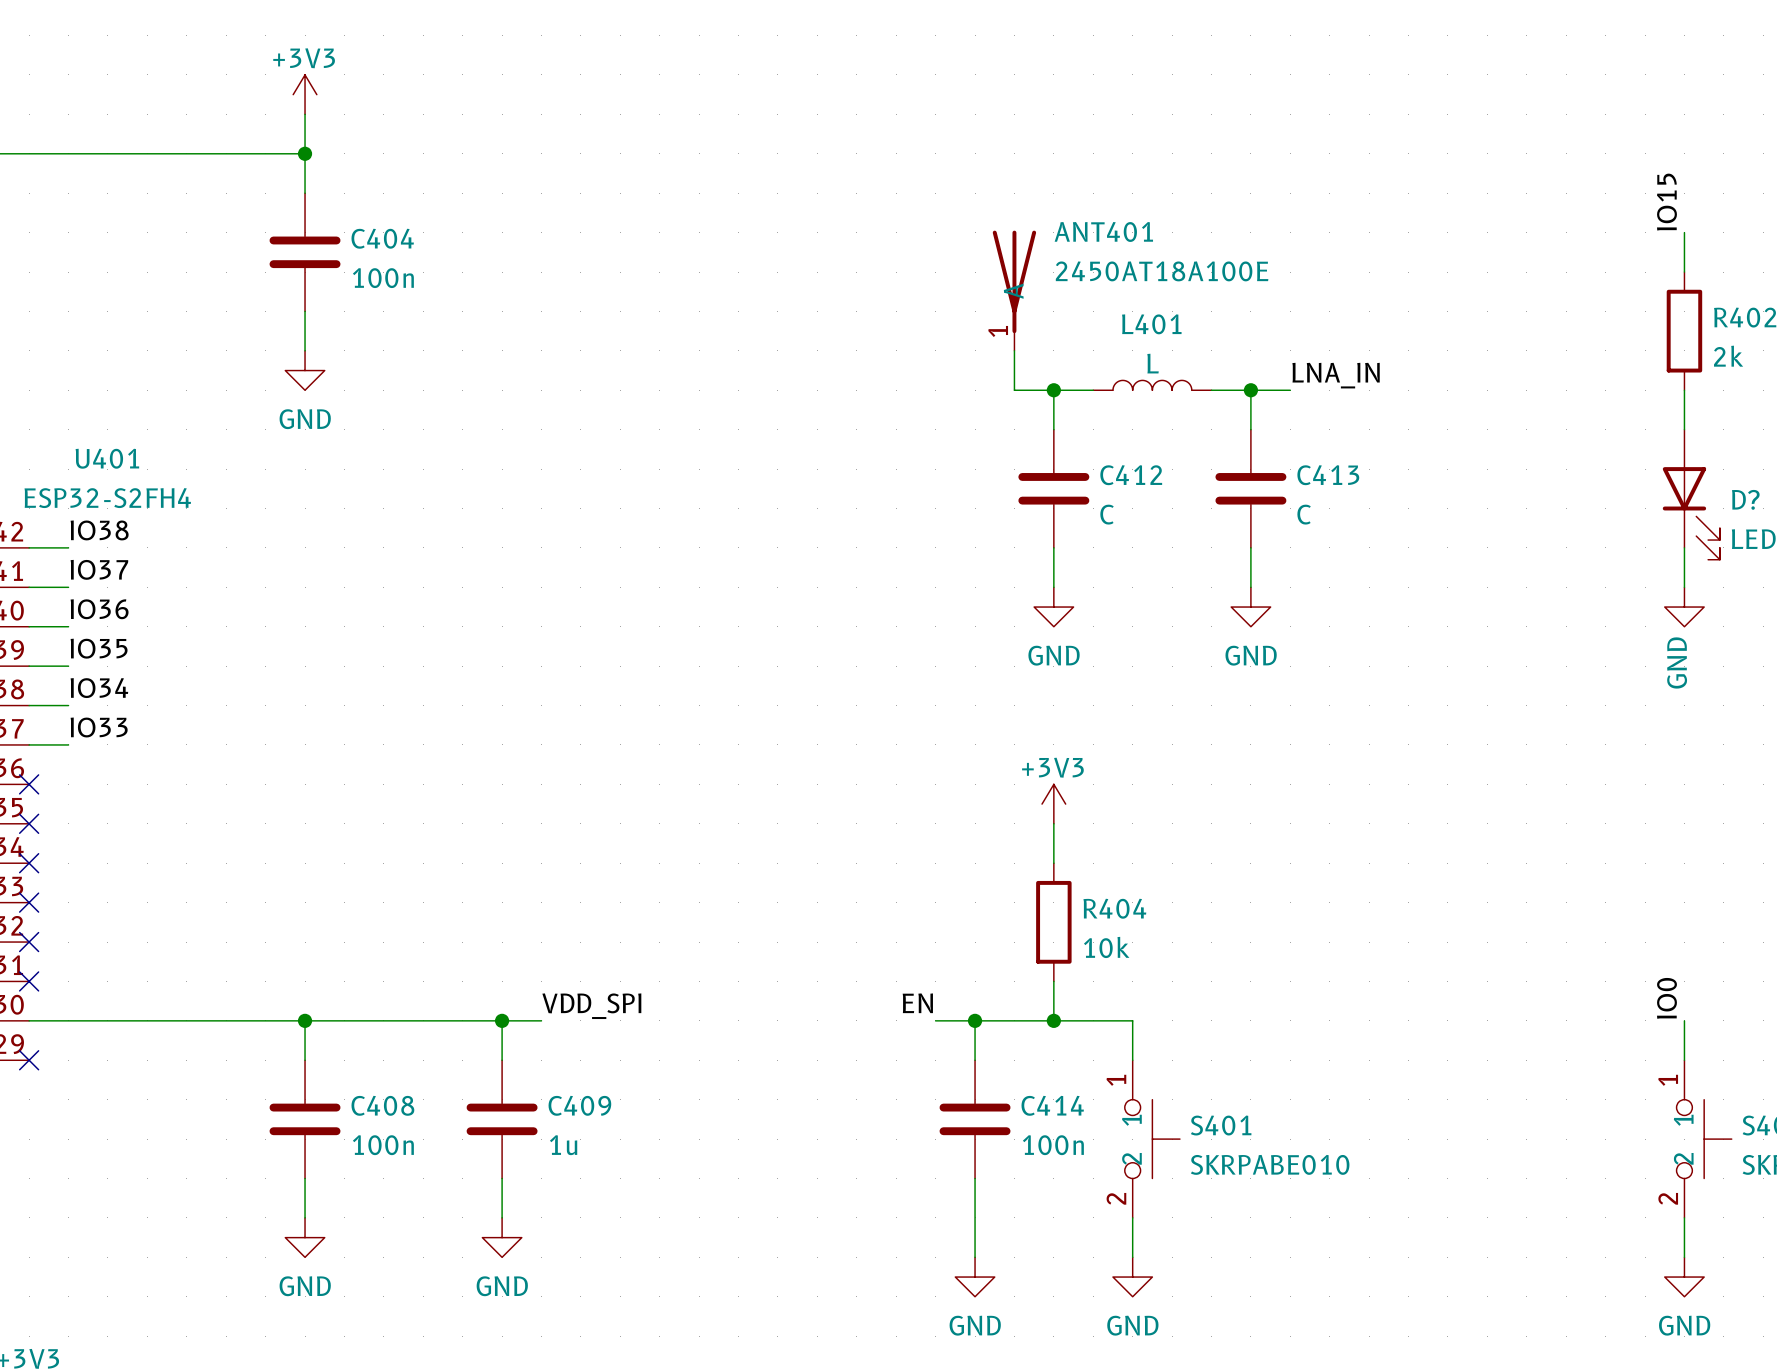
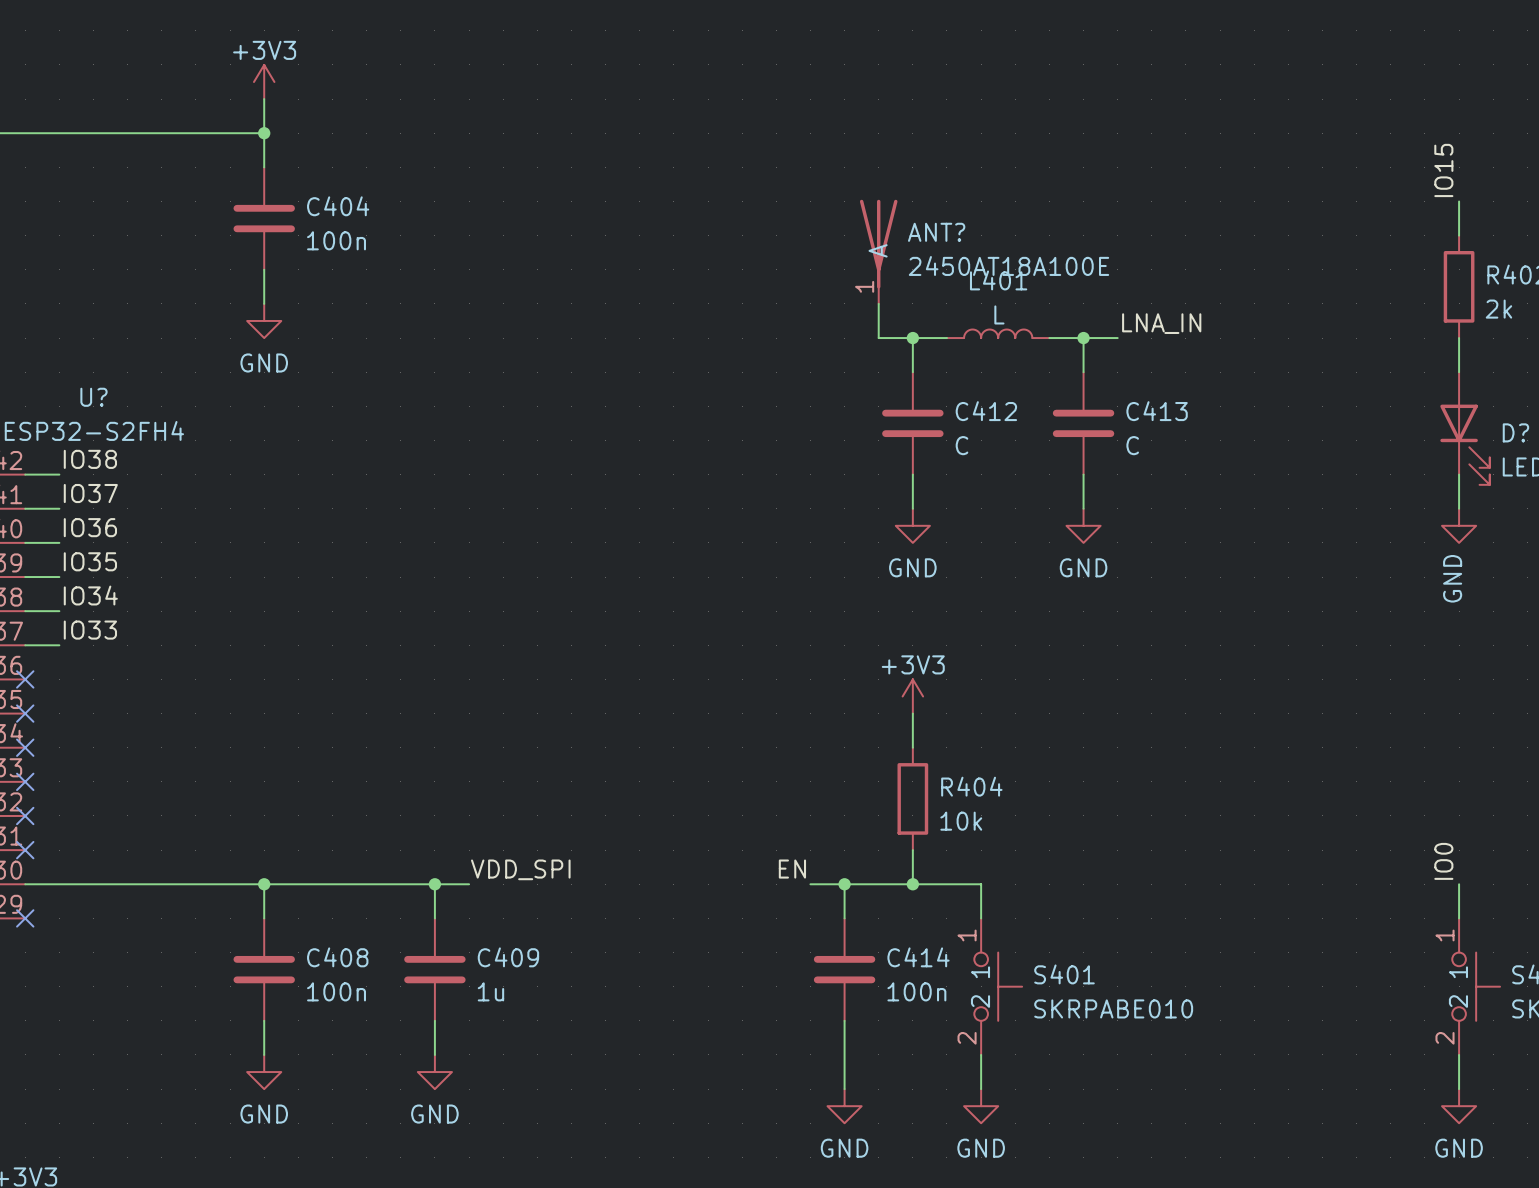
ANT401 name: ANT401 (1103, 231) -> ANT? (936, 232)
ANT401 value position: 2450AT18A100E (1162, 271) -> 2450AT18A100E (1008, 266)
U401 name: U401 (107, 458) -> U? (93, 397)

